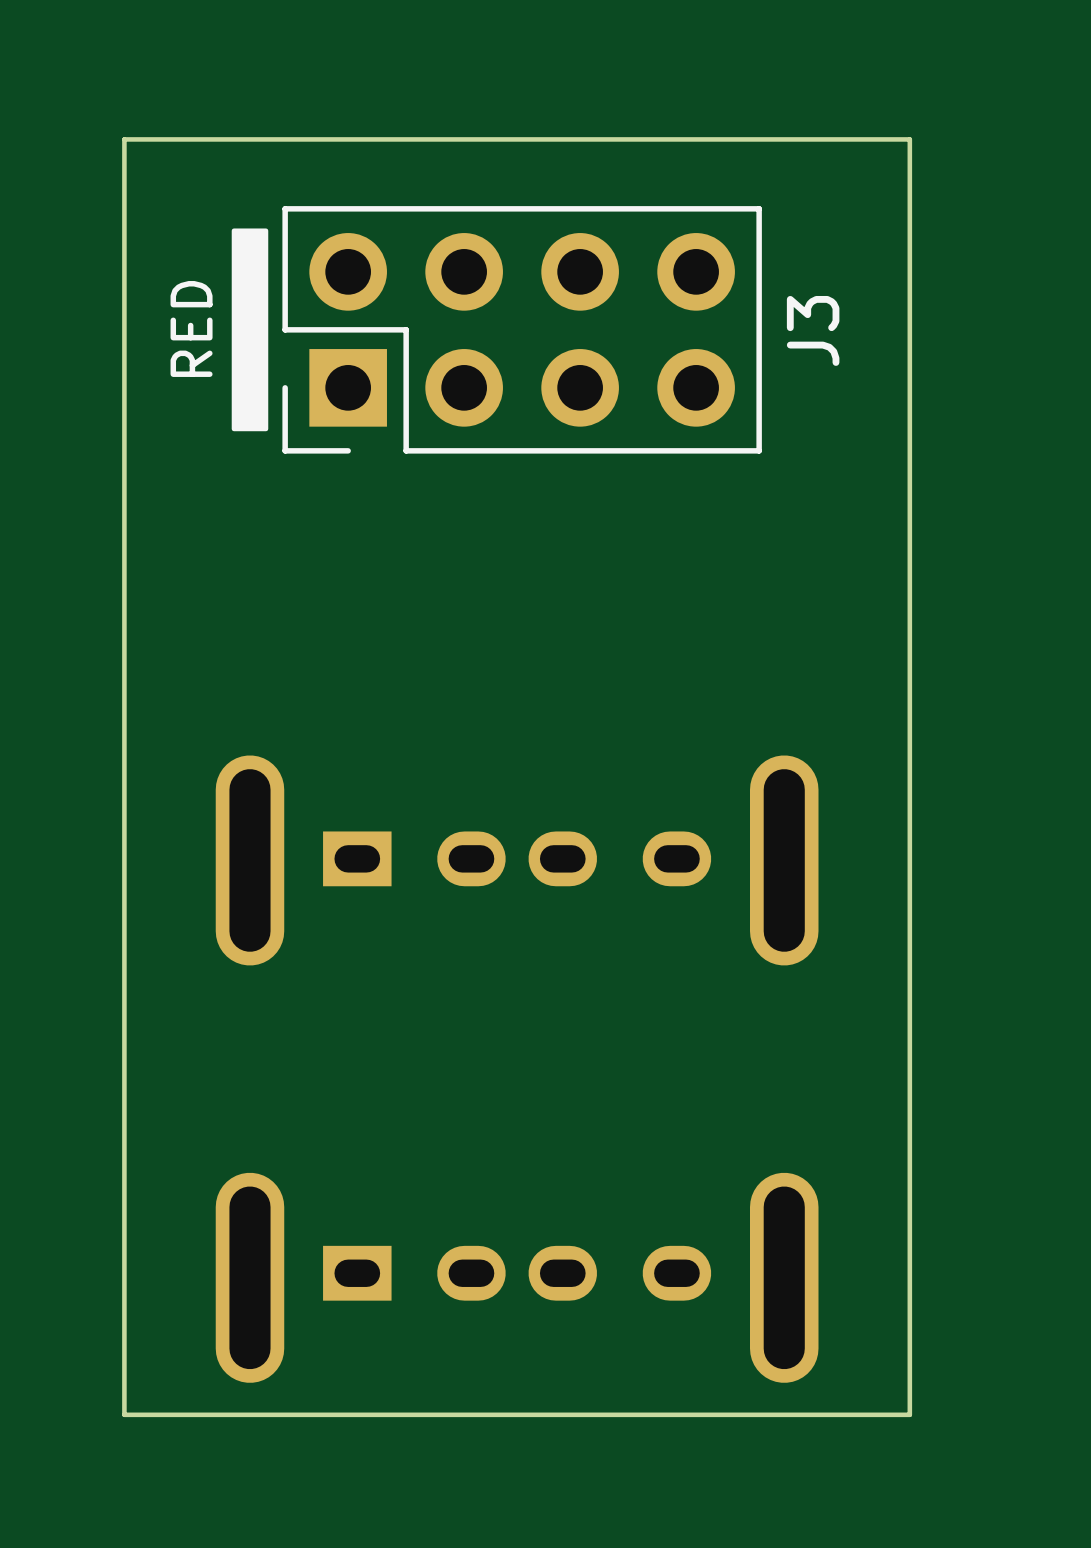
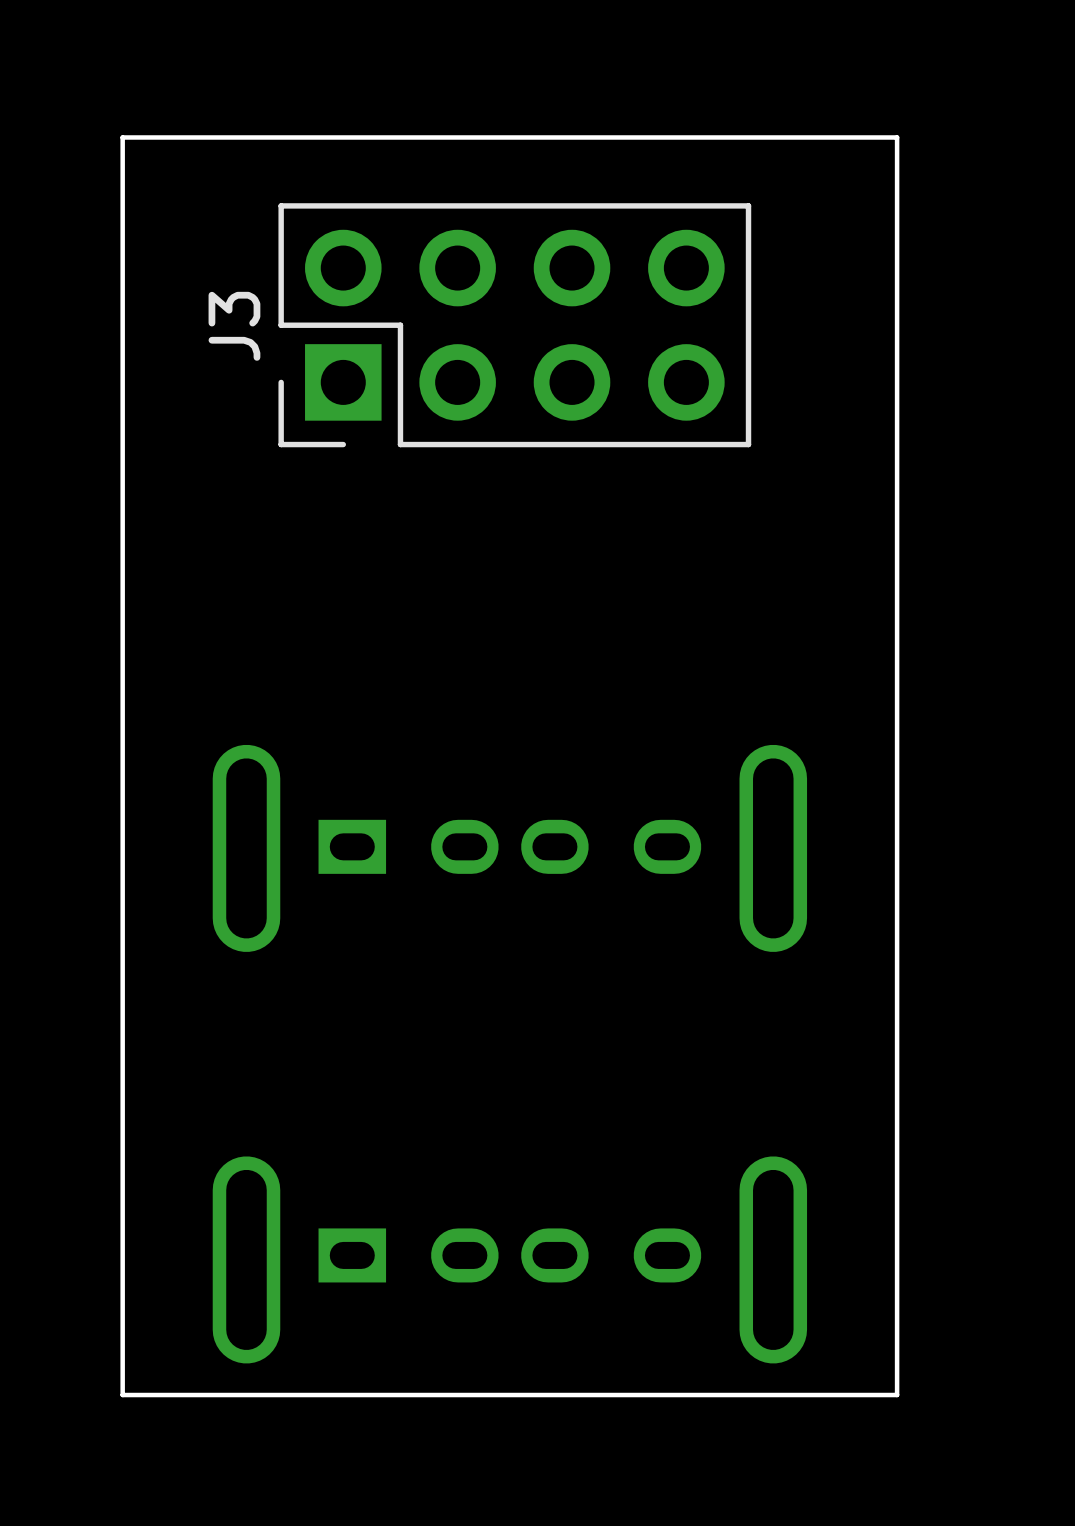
drawing: [231, 228, 269, 432] -> none
text: RED (191, 328) -> none
J3 name position: J3 (813, 330) -> J3 (234, 326)

